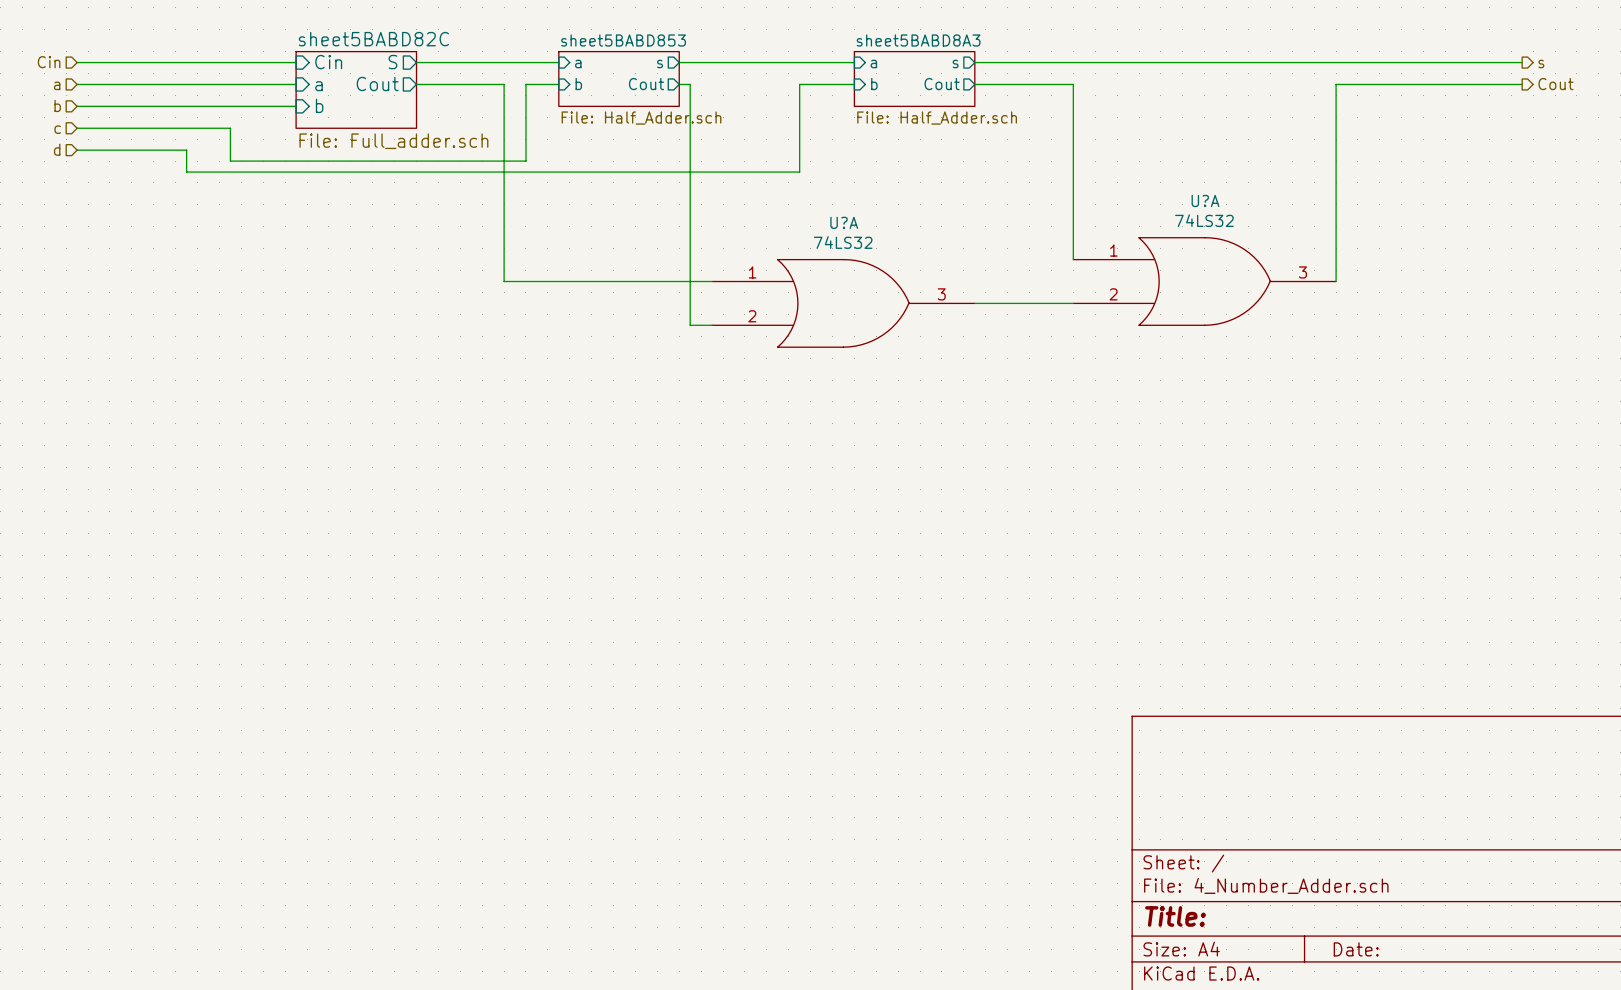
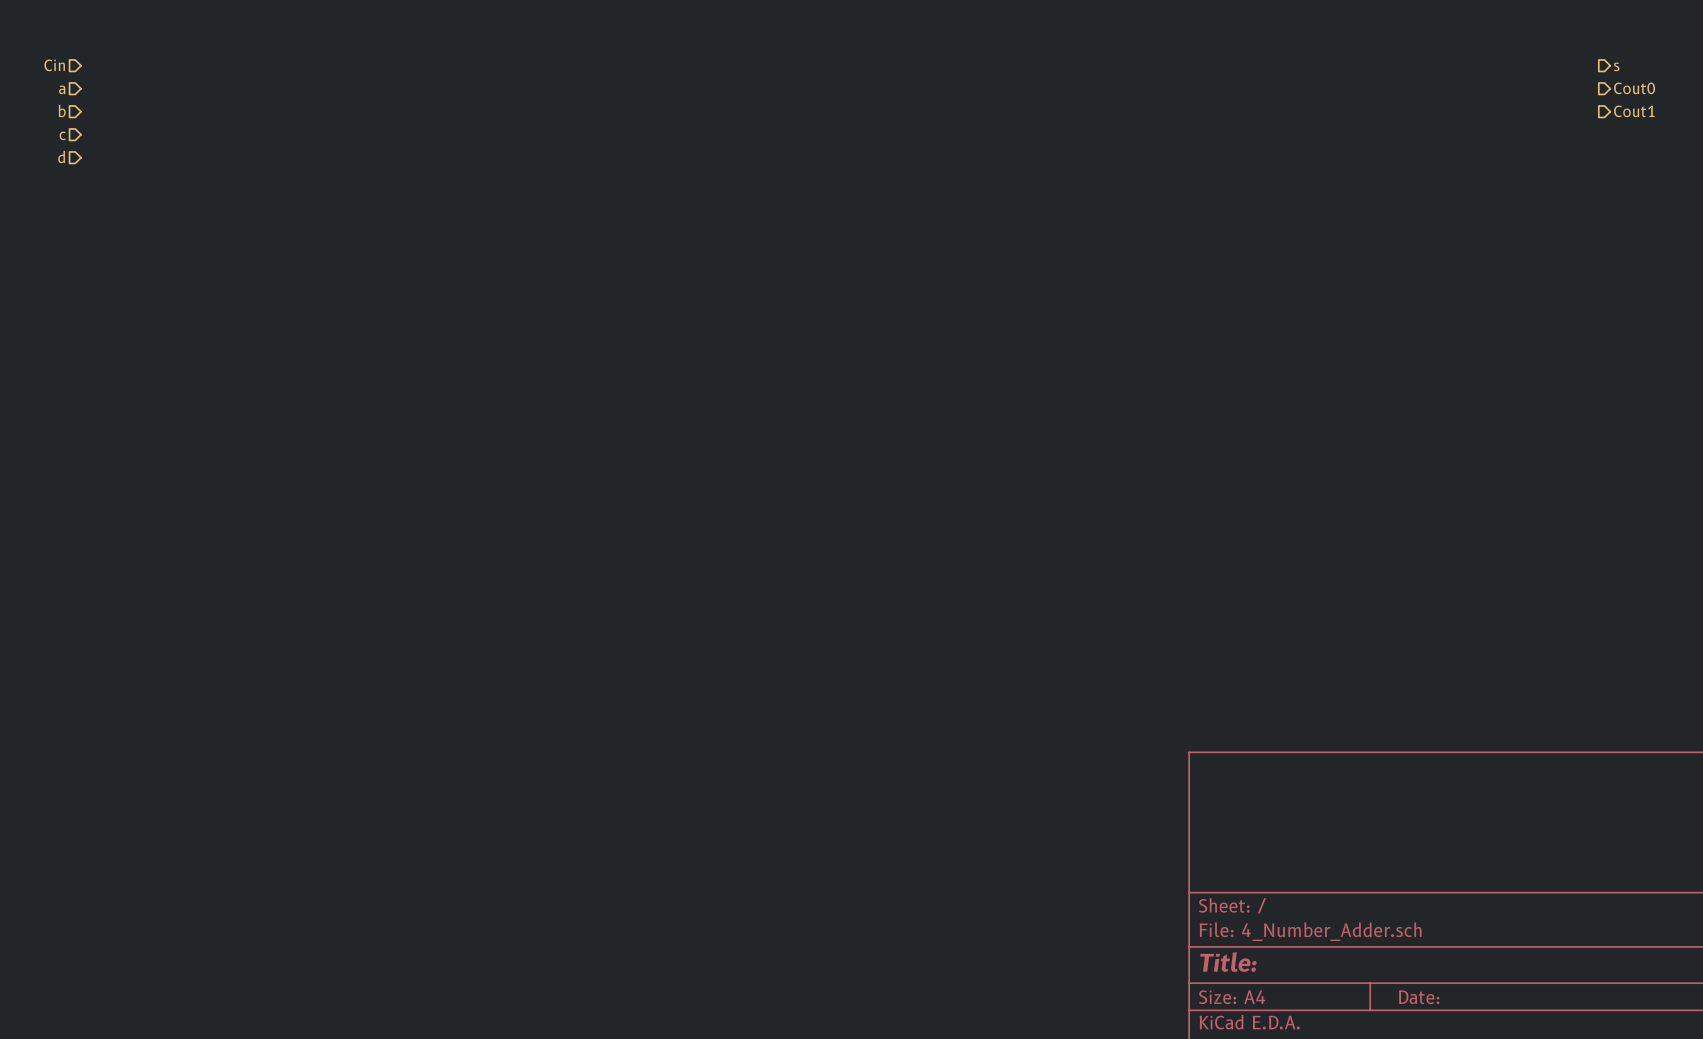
wire: (77, 62) (296, 62) -> none
sheet pin: Cin (328, 62) -> none
sheet pin: S (392, 62) -> none
wire: (416, 62) (558, 62) -> none
wire: (679, 62) (854, 62) -> none
wire: (974, 62) (1522, 62) -> none
sheet pin: a (578, 63) -> none
sheet pin: s (660, 63) -> none
sheet pin: a (873, 63) -> none
sheet pin: s (955, 63) -> none
sheet sheet5BABD853: File: Half_Adder.sch (619, 78) -> none
sheet sheet5BABD8A3: File: Half_Adder.sch (914, 78) -> none
sheet pin: Cout (377, 83) -> none
wire: (77, 84) (296, 84) -> none
wire: (416, 84) (504, 84) (504, 281) (712, 281) -> none
wire: (558, 84) (525, 84) (525, 161) (230, 161) (230, 128) (77, 128) -> none
sheet pin: b (578, 84) -> none
sheet pin: Cout (646, 84) -> none
wire: (679, 84) (690, 84) (690, 325) (712, 325) -> none
wire: (854, 84) (799, 84) (799, 172) (186, 172) (186, 150) (77, 150) -> none
sheet pin: b (874, 84) -> none
sheet pin: Cout (942, 84) -> none
wire: (974, 84) (1073, 84) (1073, 259) -> none
wire: (1522, 84) (1336, 84) (1336, 281) -> none
hierarchical label: Cout (1555, 84) -> Cout0 (1634, 88)
sheet pin: a (319, 86) -> none
sheet sheet5BABD82C: File: Full_adder.sch (356, 89) -> none
sheet pin: b (319, 105) -> none
hierarchical label: none -> Cout1 (1634, 111)
wire: (77, 106) (296, 106) -> none
U?A: 74LS32 (1204, 281) -> none
U?A: 74LS32 (843, 303) -> none
wire: (974, 303) (1073, 303) -> none

